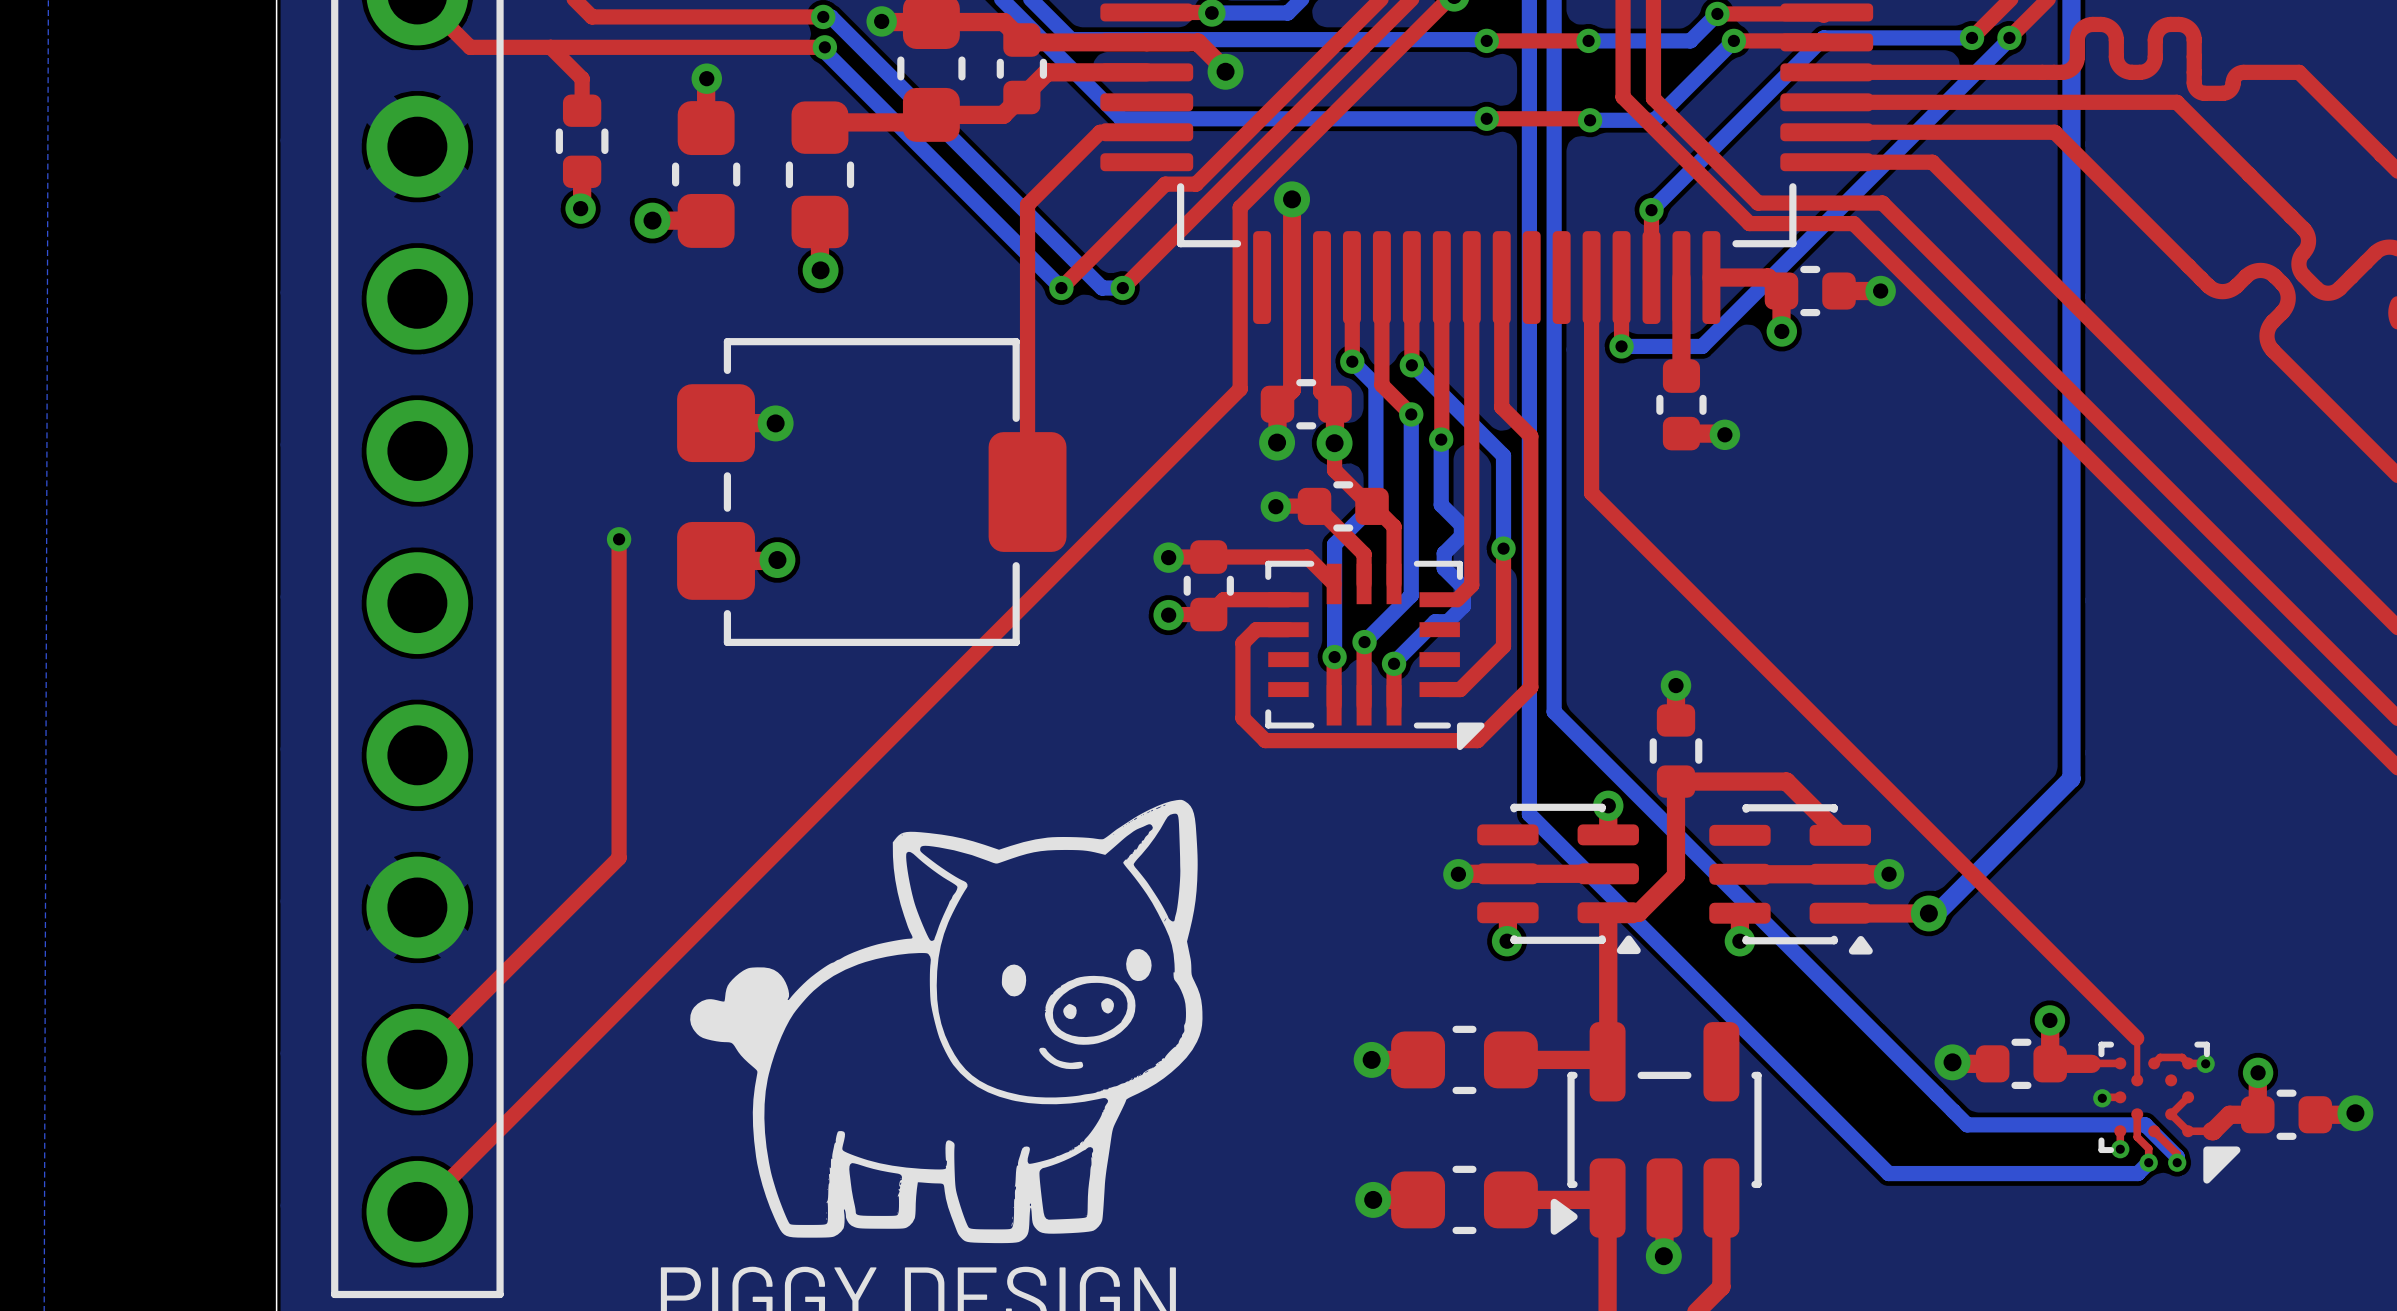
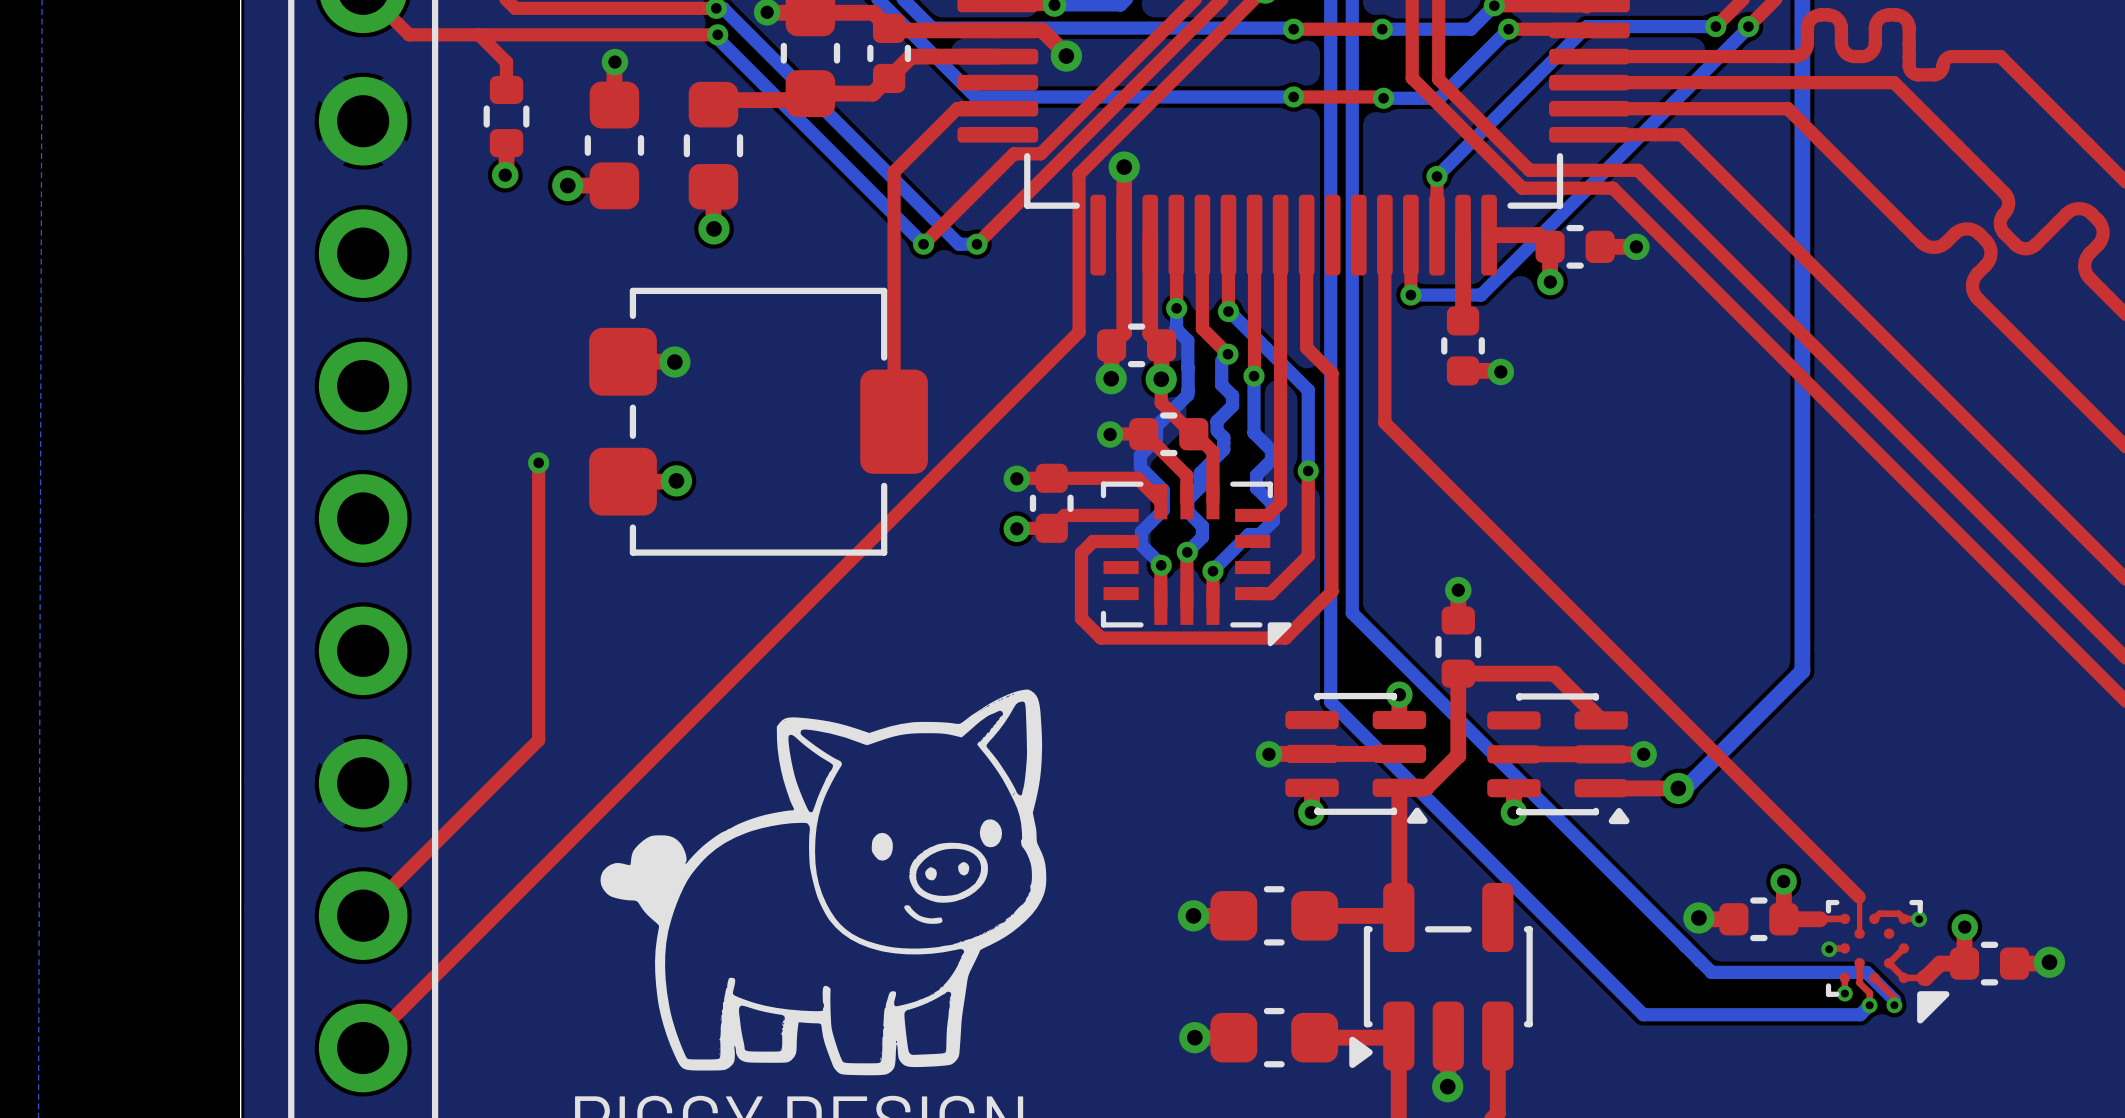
bottom track: (1352, 361) (1375, 385) (1375, 503) (1334, 544) (1334, 652) -> (1176, 308) (1175, 328) (1187, 340) (1187, 367)
bottom track: (1411, 414) (1411, 595) (1381, 624) -> (1227, 354) (1221, 360) (1221, 384) (1232, 395) (1232, 405) (1217, 421) (1217, 430) (1223, 437) (1223, 449) (1200, 473) (1200, 487) (1187, 499) (1187, 511) (1202, 526) (1202, 537)
bottom track: none -> (1188, 368) (1188, 390)
bottom track: none -> (1187, 390) (1187, 394) (1156, 426) (1156, 439) (1140, 455) (1140, 467) (1163, 490) (1163, 510) (1141, 531) (1141, 545) (1161, 564)

